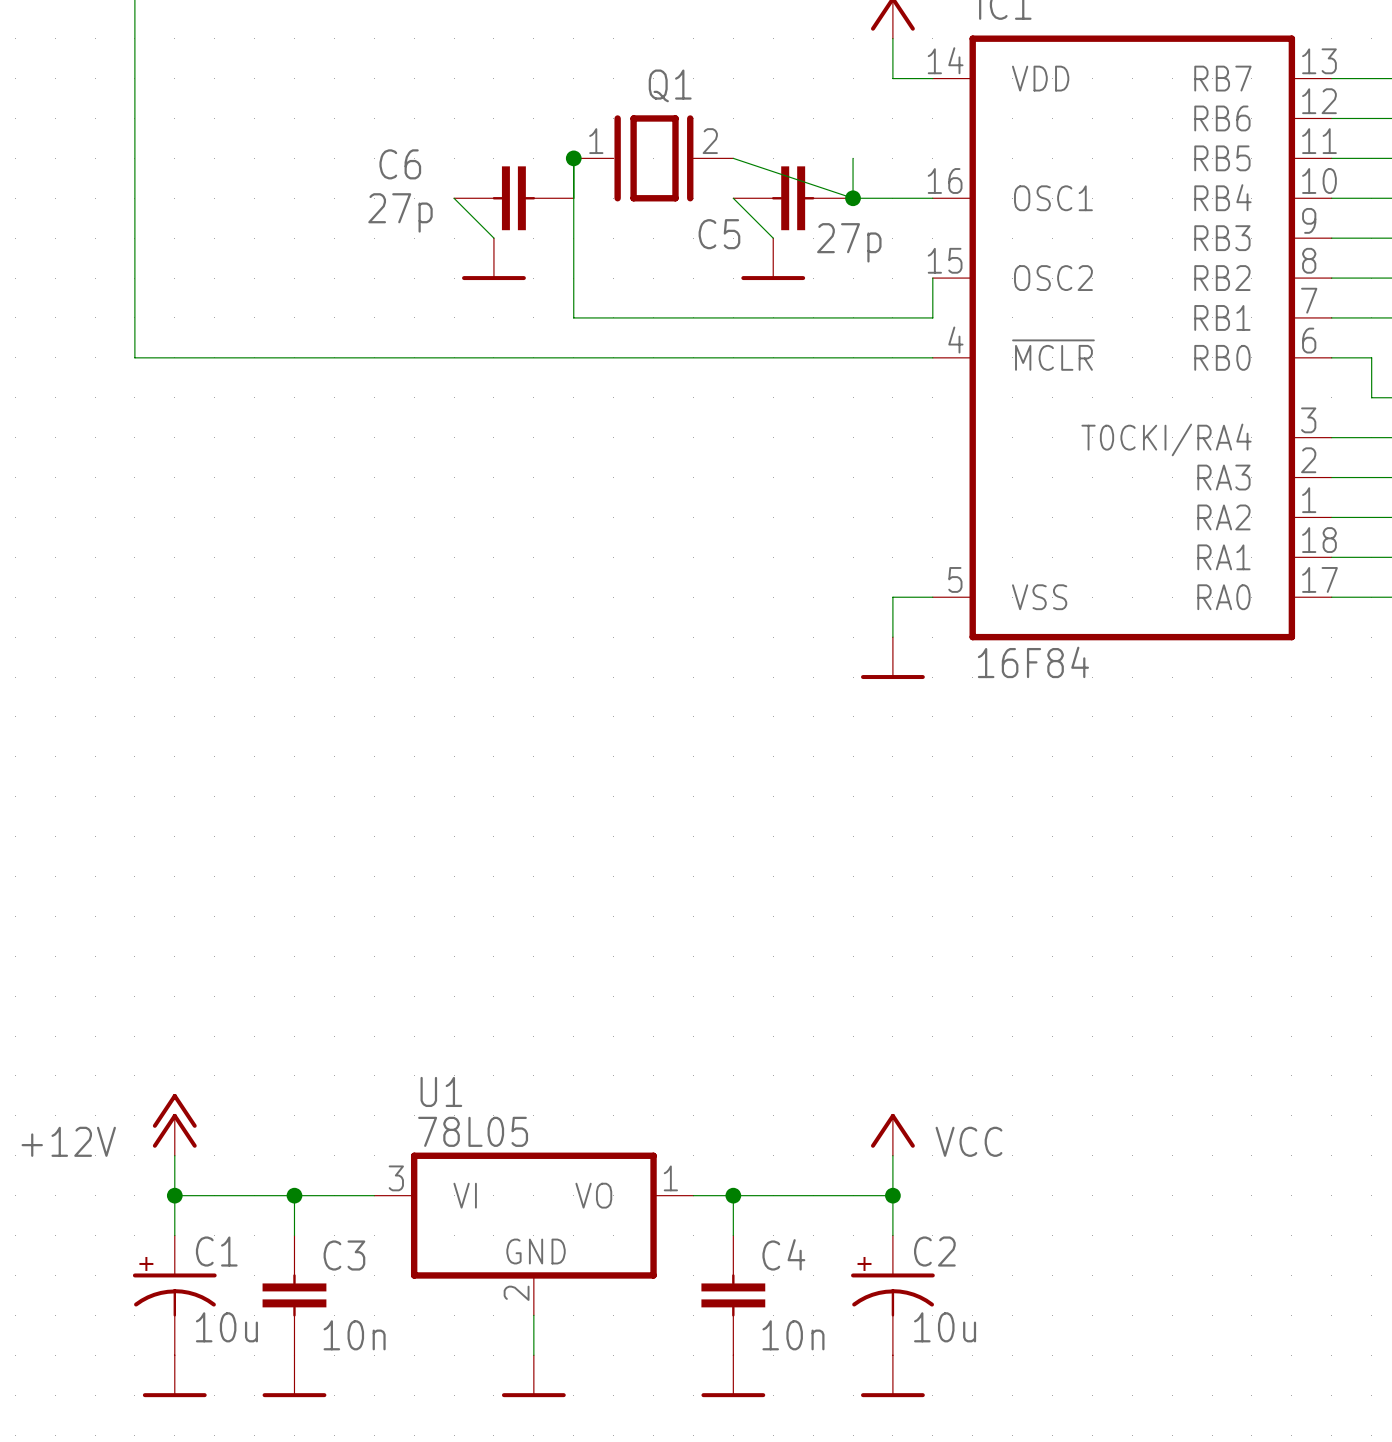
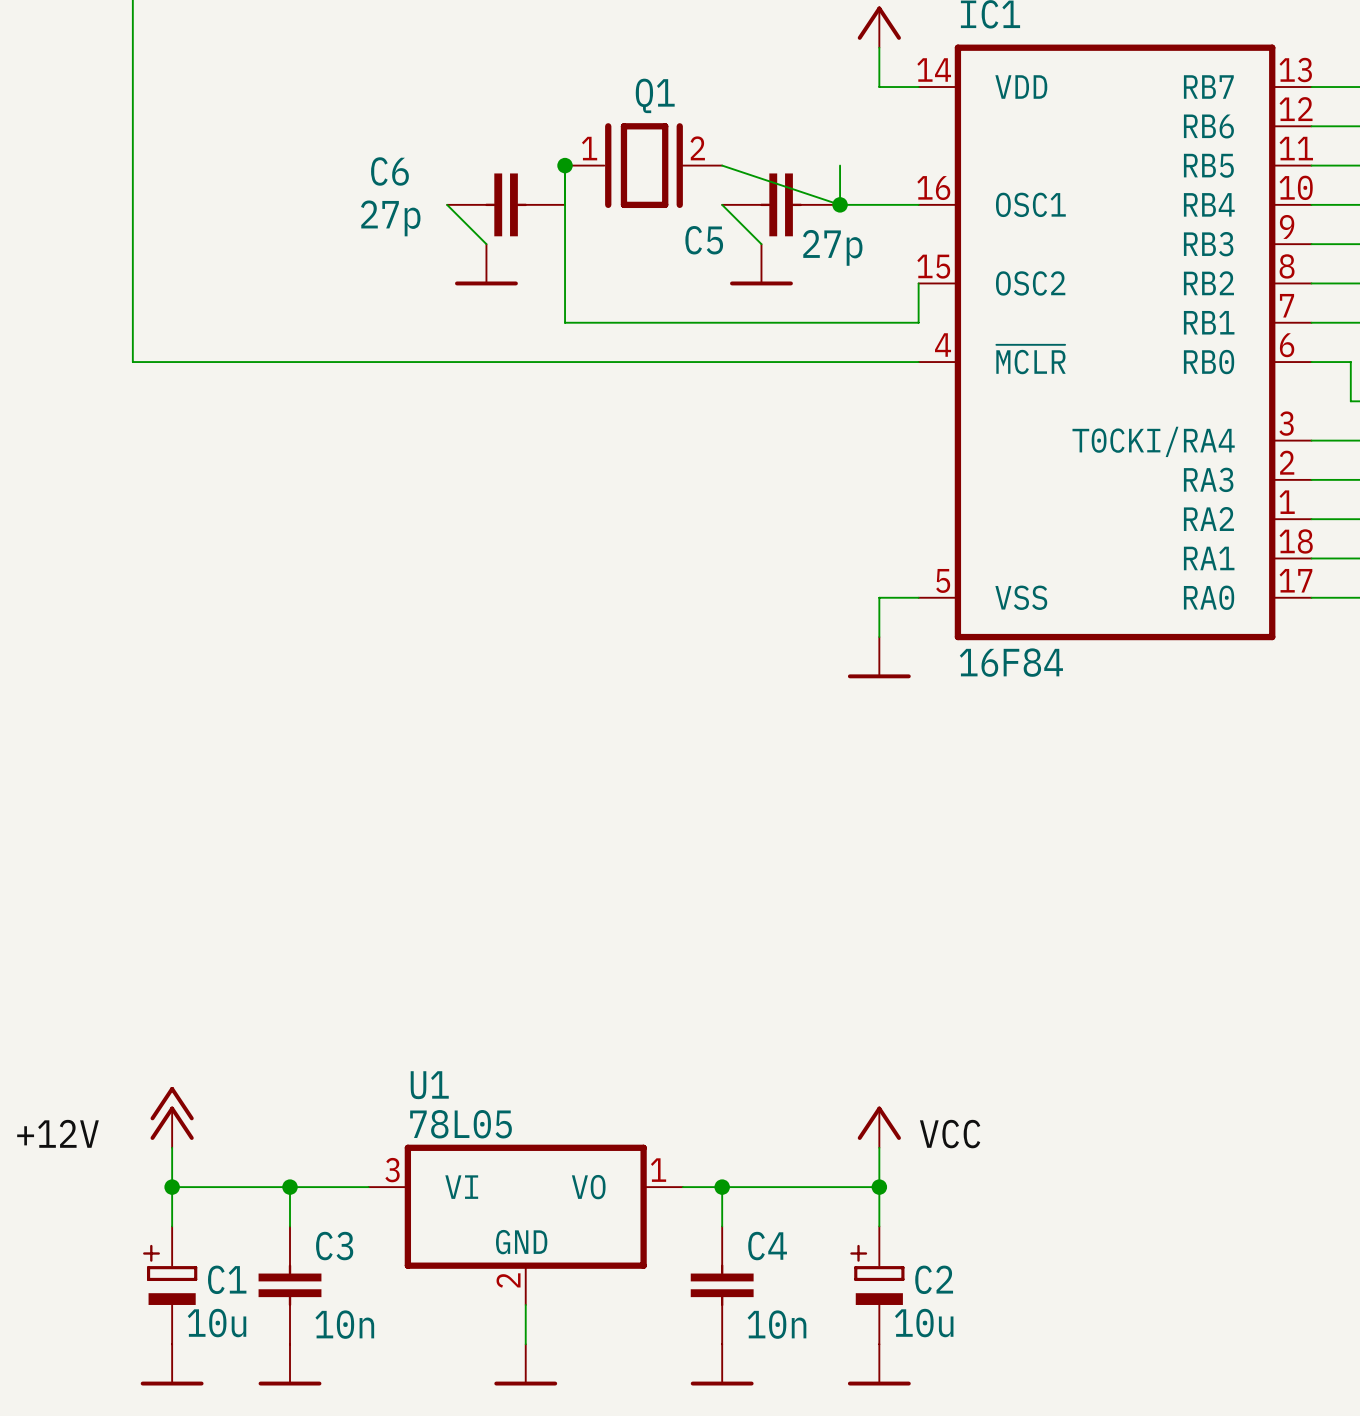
C1 symbol: [132, 1235, 217, 1356] -> [143, 1226, 198, 1345]
C2 symbol: [851, 1235, 935, 1356] -> [850, 1226, 905, 1345]
C1 name position: C1 (216, 1251) -> C1 (227, 1279)
C2 name position: C2 (934, 1251) -> C2 (934, 1279)

